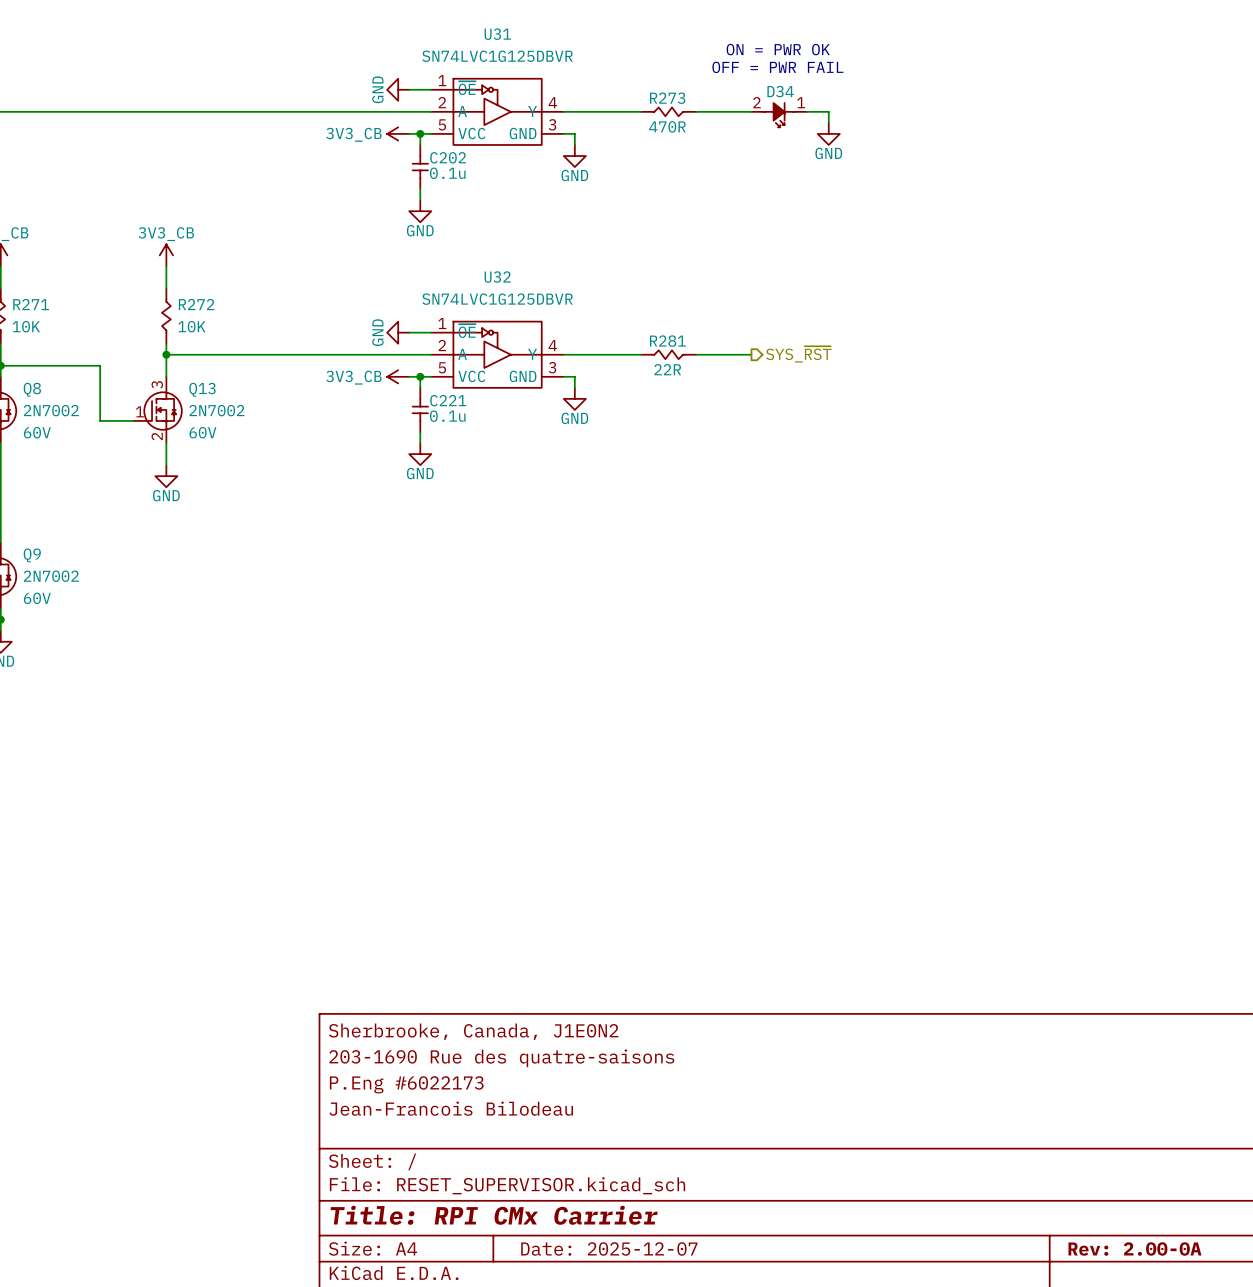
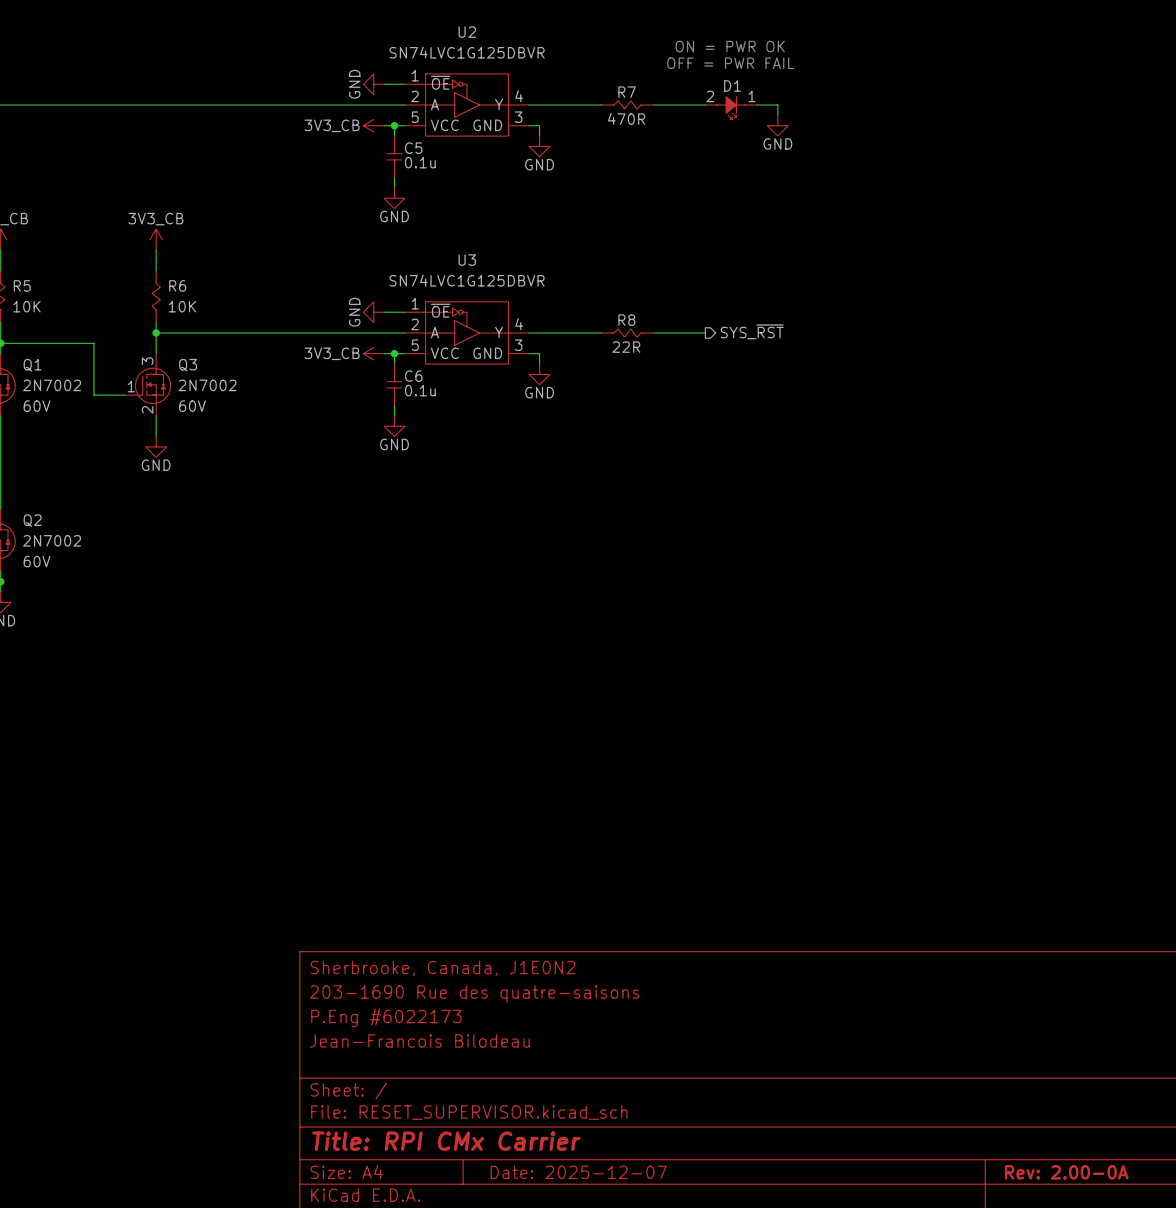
U31 name: U31 (497, 34) -> U2 (467, 32)
D34 name: D34 (780, 91) -> D1 (732, 85)
R273 name: R273 (667, 98) -> R7 (627, 92)
C202 name: C202 (448, 157) -> C5 (413, 148)
U32 name: U32 (497, 277) -> U3 (467, 260)
R271 name: R271 (31, 304) -> R5 (22, 285)
R272 name: R272 (196, 304) -> R6 (177, 285)
R281 name: R281 (667, 341) -> R8 (626, 320)
Q8 name: Q8 (32, 389) -> Q1 (32, 365)
Q13 name: Q13 (202, 389) -> Q3 (188, 365)
C221 name: C221 (448, 400) -> C6 (413, 376)
Q9 name: Q9 (32, 555) -> Q2 (32, 520)

